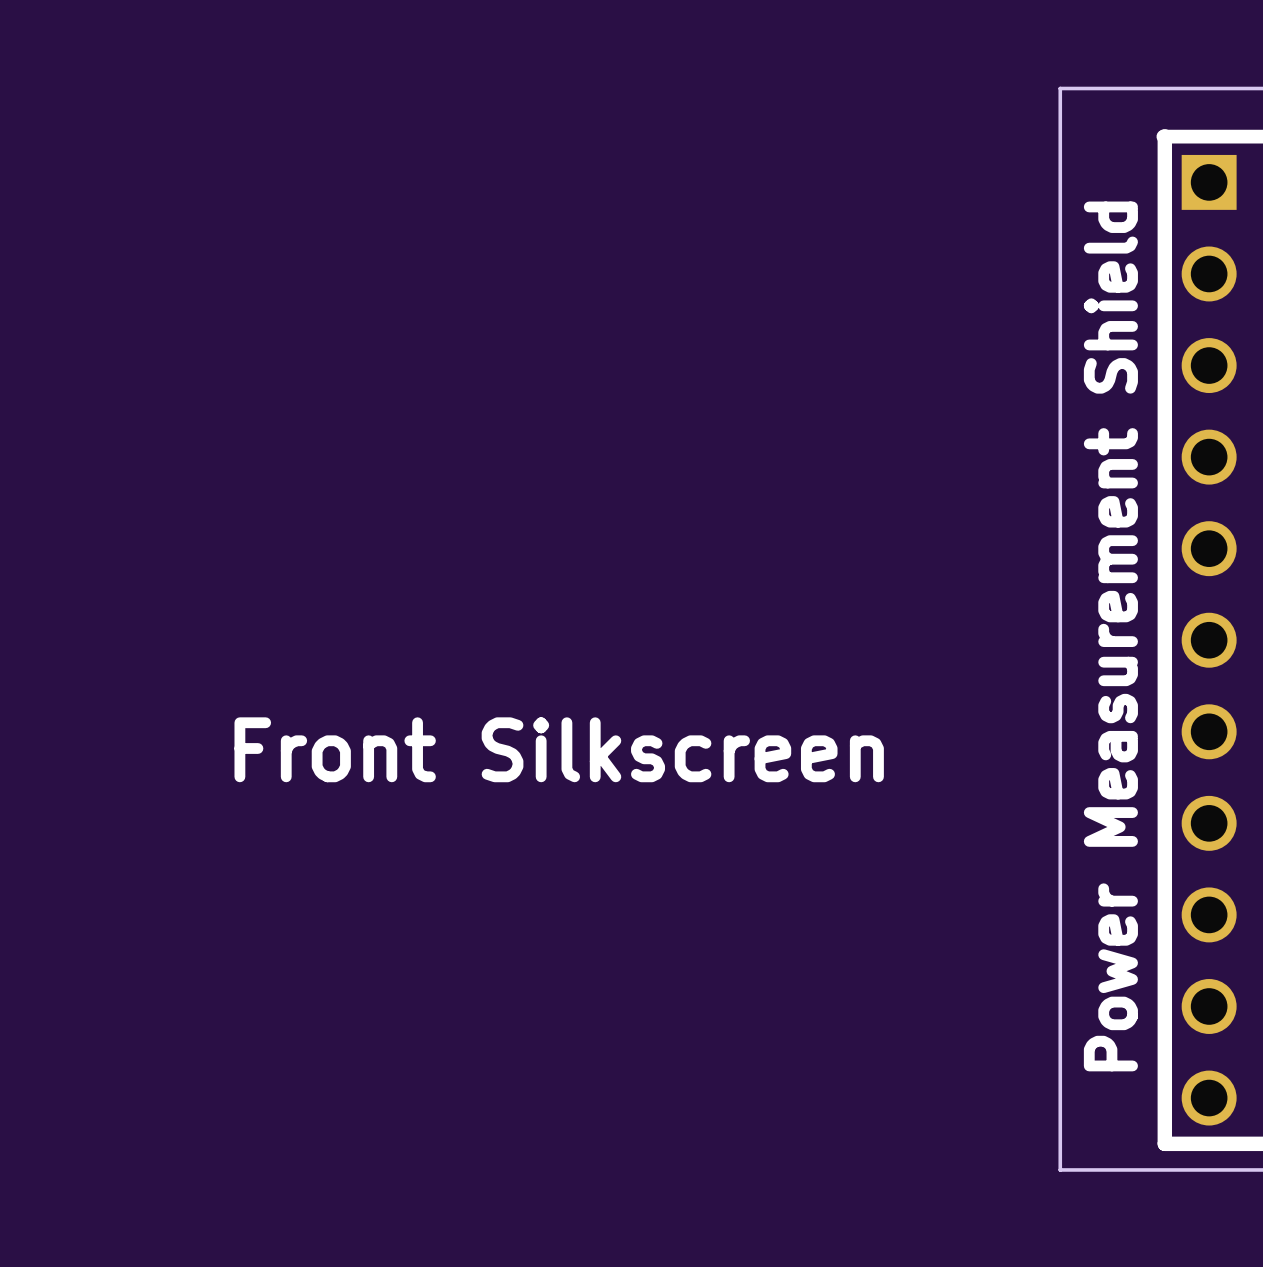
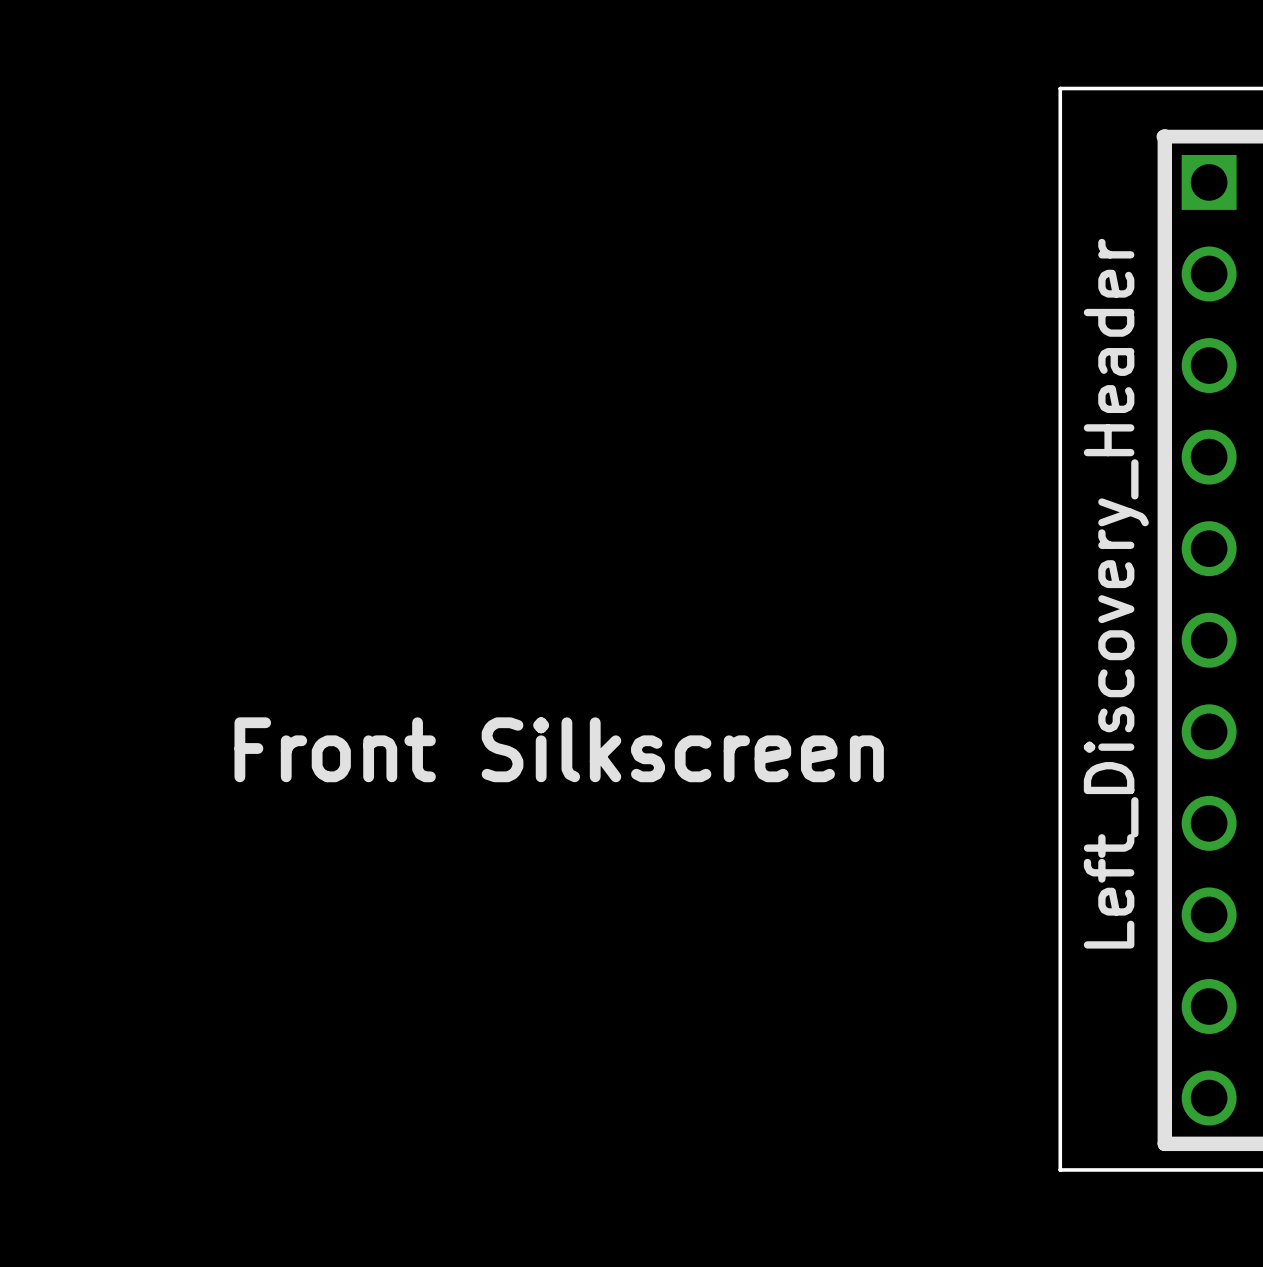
part value: none -> Left_Discovery_Header (1116, 593)
text: Power Measurement Shield (1110, 636) -> none

